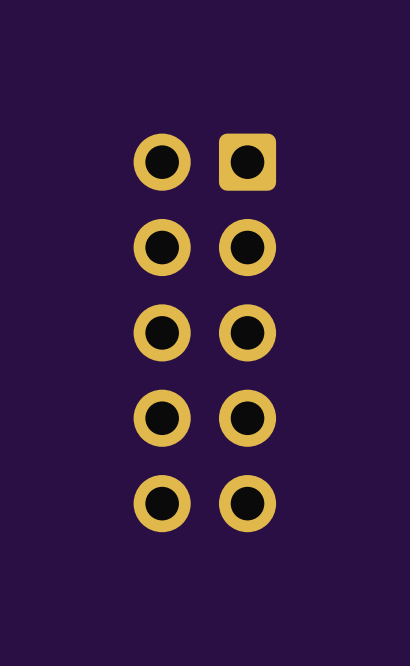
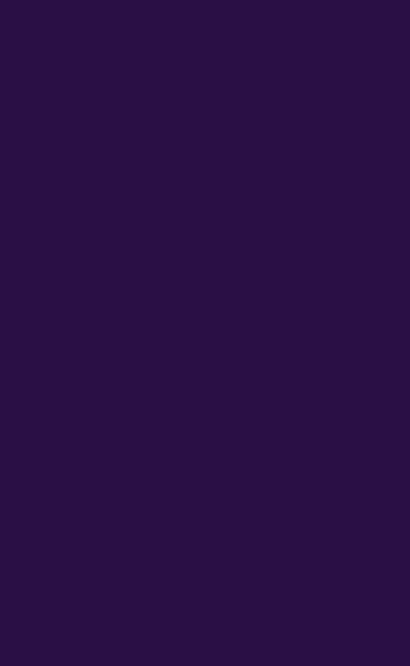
part: (204, 332) -> none

